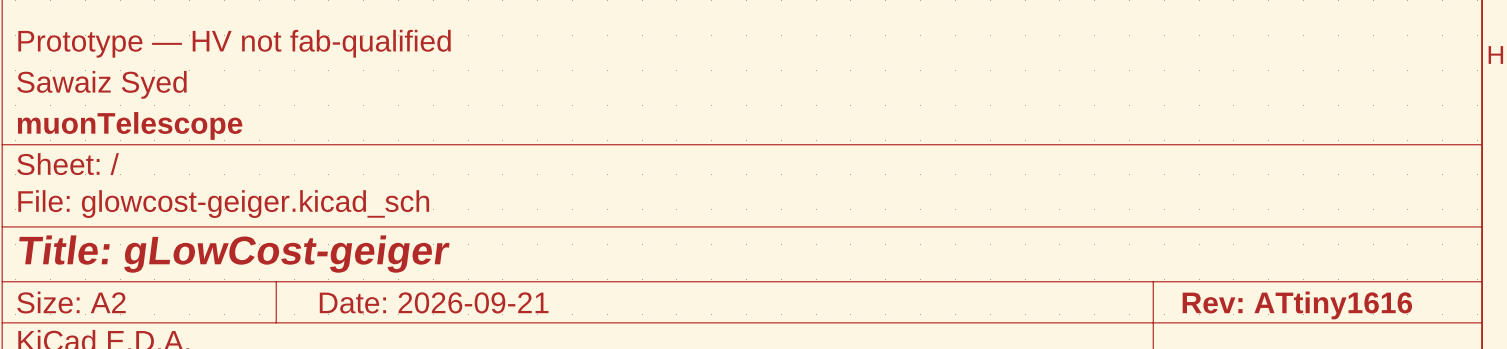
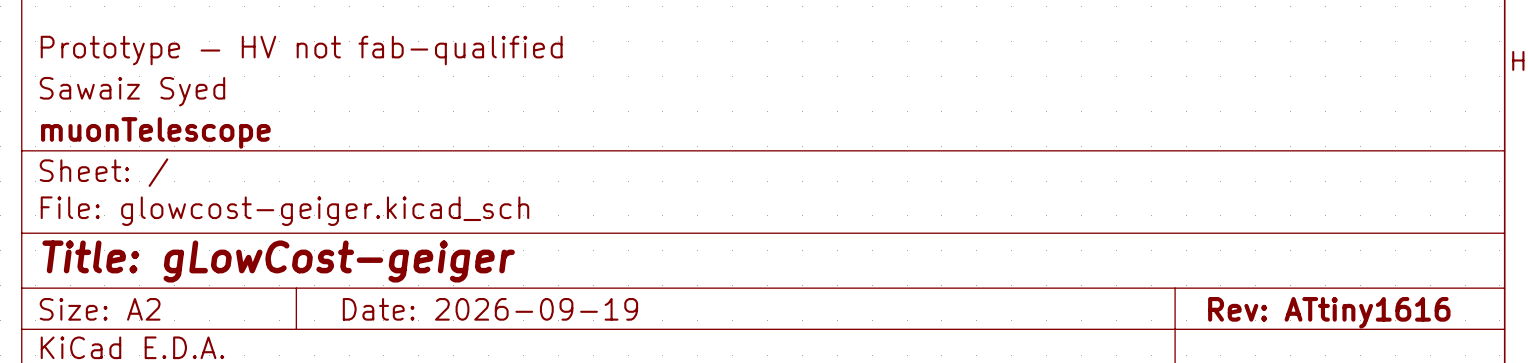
title block: Date: 2026-09-21 (434, 302) -> Date: 2026-09-19 (490, 309)

